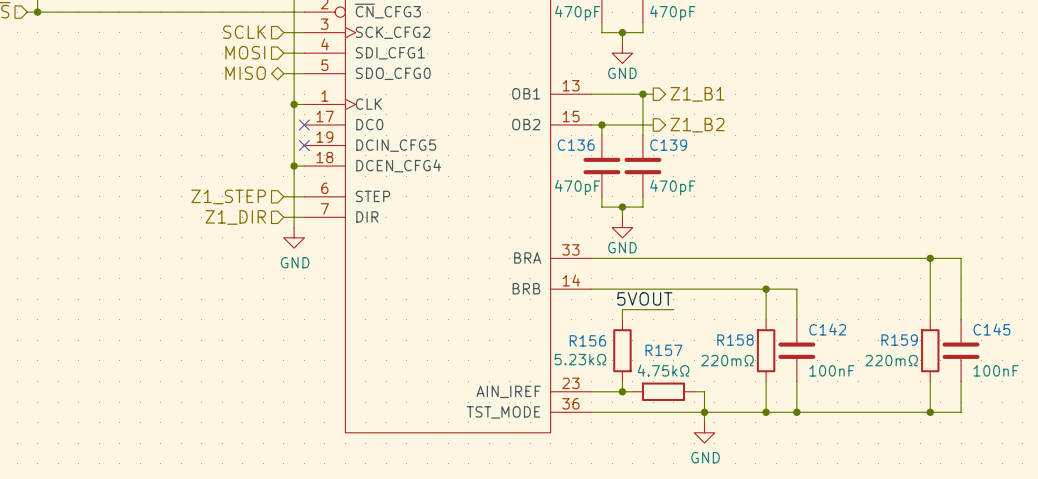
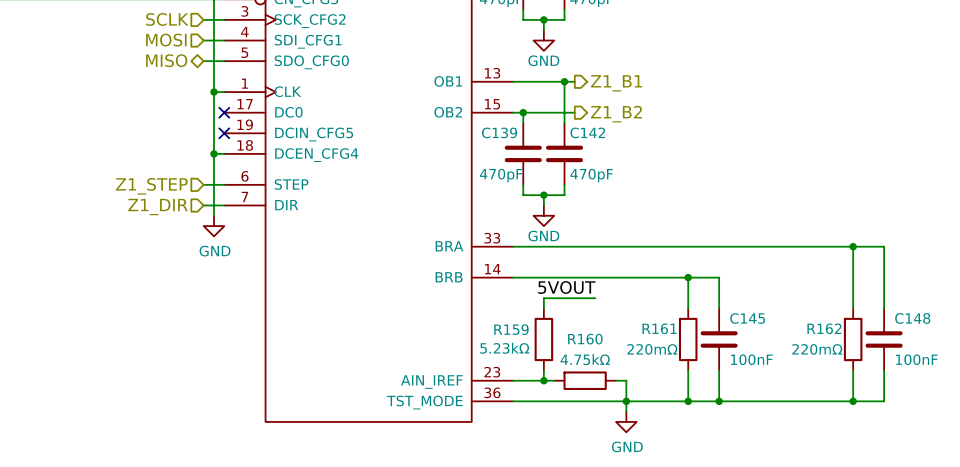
C136 name: C136 (576, 145) -> C139 (499, 132)
C139 name: C139 (668, 145) -> C142 (587, 132)
C142 name: C142 (827, 329) -> C145 (747, 318)
C145 name: C145 (991, 329) -> C148 (912, 318)
R156 name: R156 (587, 340) -> R159 (511, 329)
R158 name: R158 (735, 340) -> R161 (659, 328)
R159 name: R159 (899, 340) -> R162 (824, 328)
R157 name: R157 (663, 350) -> R160 (585, 339)

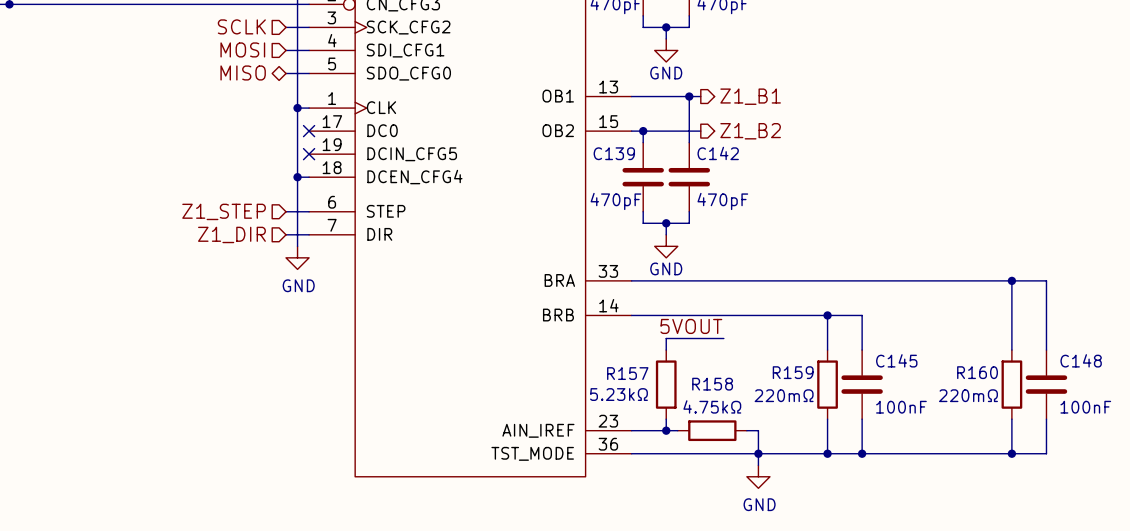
R161 name: R161 (659, 328) -> R159 (793, 372)
R162 name: R162 (824, 328) -> R160 (977, 372)
R159 name: R159 (511, 329) -> R157 (627, 373)
R160 name: R160 (585, 339) -> R158 (712, 384)

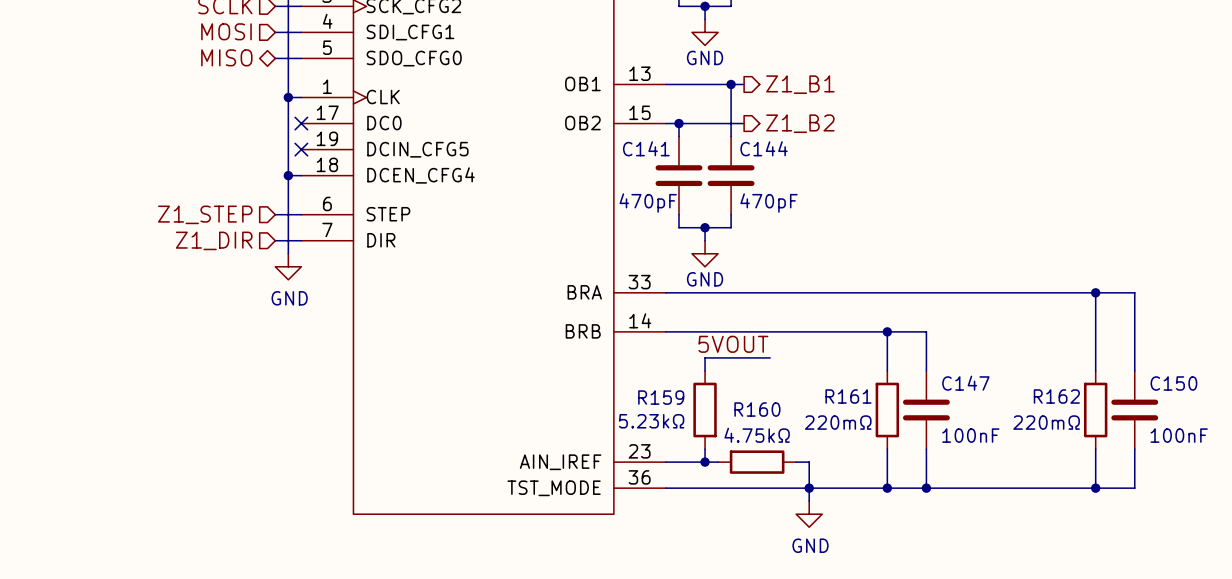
C139 name: C139 (614, 153) -> C141 (646, 148)
C142 name: C142 (718, 153) -> C144 (764, 148)
C145 name: C145 (896, 360) -> C147 (965, 383)
C148 name: C148 (1081, 360) -> C150 (1173, 383)
R159 name: R159 (793, 372) -> R161 (848, 396)
R160 name: R160 (977, 372) -> R162 (1056, 396)
R157 name: R157 (627, 373) -> R159 (661, 397)
R158 name: R158 (712, 384) -> R160 (757, 409)

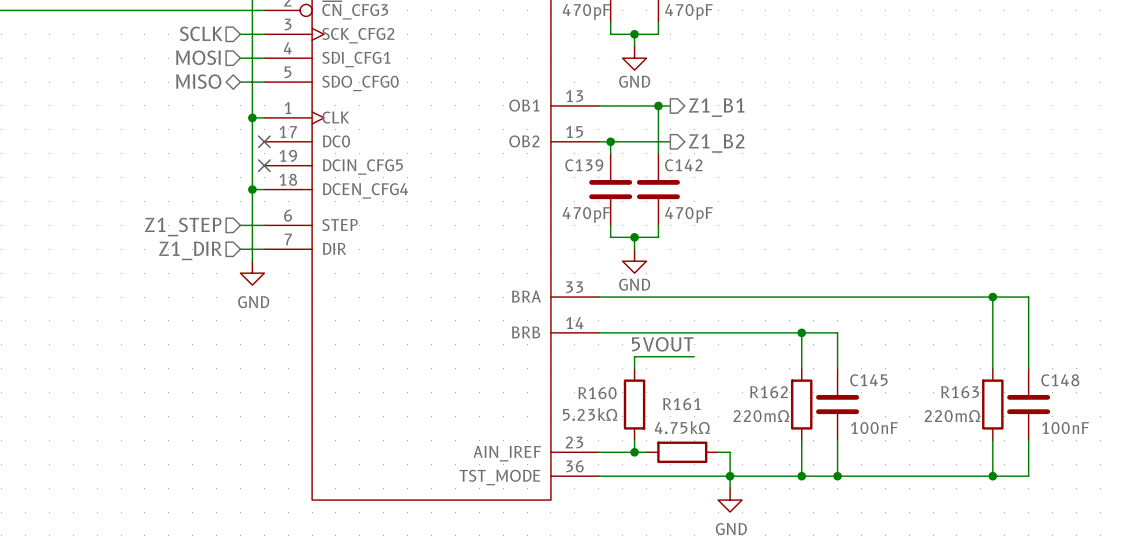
C141 name: C141 (646, 148) -> C139 (584, 165)
C144 name: C144 (764, 148) -> C142 (683, 165)
C147 name: C147 (965, 383) -> C145 (868, 380)
C150 name: C150 (1173, 383) -> C148 (1060, 380)
R161 name: R161 (848, 396) -> R162 (769, 392)
R162 name: R162 (1056, 396) -> R163 (960, 392)
R159 name: R159 (661, 397) -> R160 (597, 393)
R160 name: R160 (757, 409) -> R161 (681, 404)

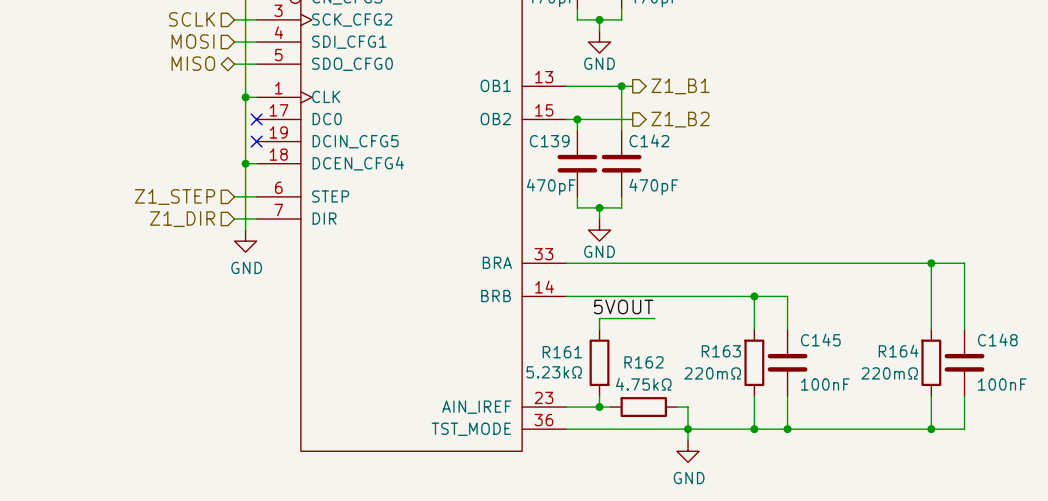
R162 name: R162 (769, 392) -> R163 (721, 351)
R163 name: R163 (960, 392) -> R164 (898, 351)
R160 name: R160 (597, 393) -> R161 (562, 352)
R161 name: R161 (681, 404) -> R162 (644, 362)

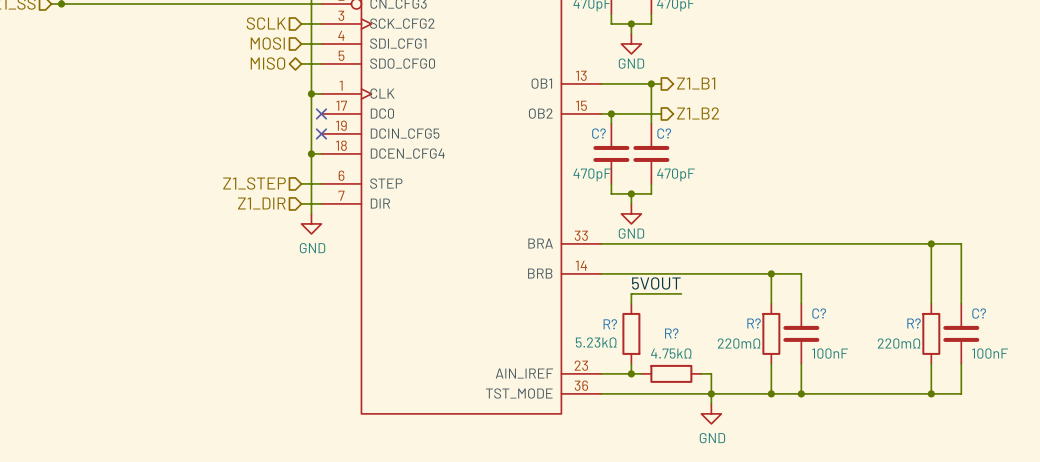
C142 name: C142 (649, 140) -> C? (664, 133)
C139 name: C139 (549, 141) -> C? (598, 133)
C145 name: C145 (820, 339) -> C? (819, 313)
C148 name: C148 (997, 339) -> C? (979, 313)
R163 name: R163 (721, 351) -> R? (754, 323)
R164 name: R164 (898, 351) -> R? (914, 323)
R161 name: R161 (562, 352) -> R? (610, 324)
R162 name: R162 (644, 362) -> R? (671, 333)

